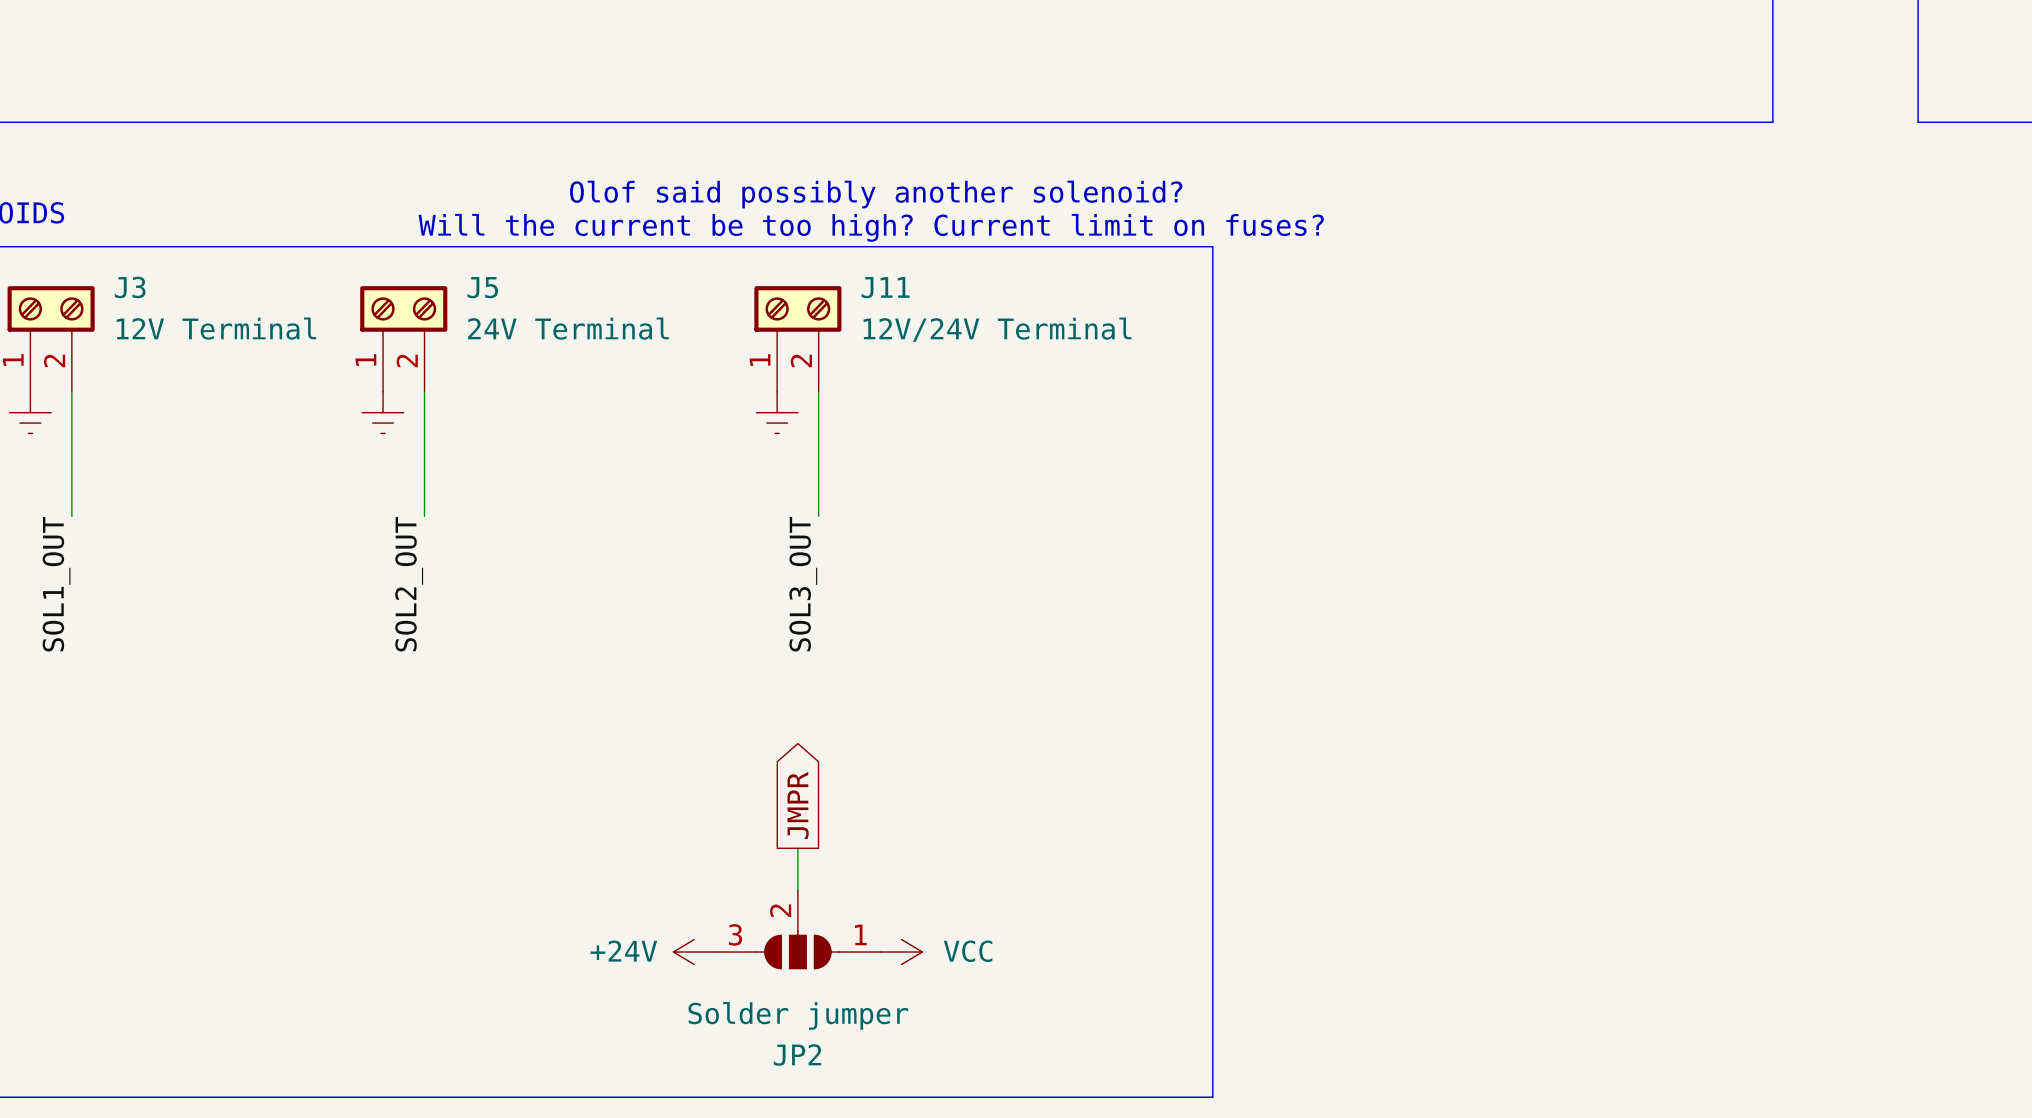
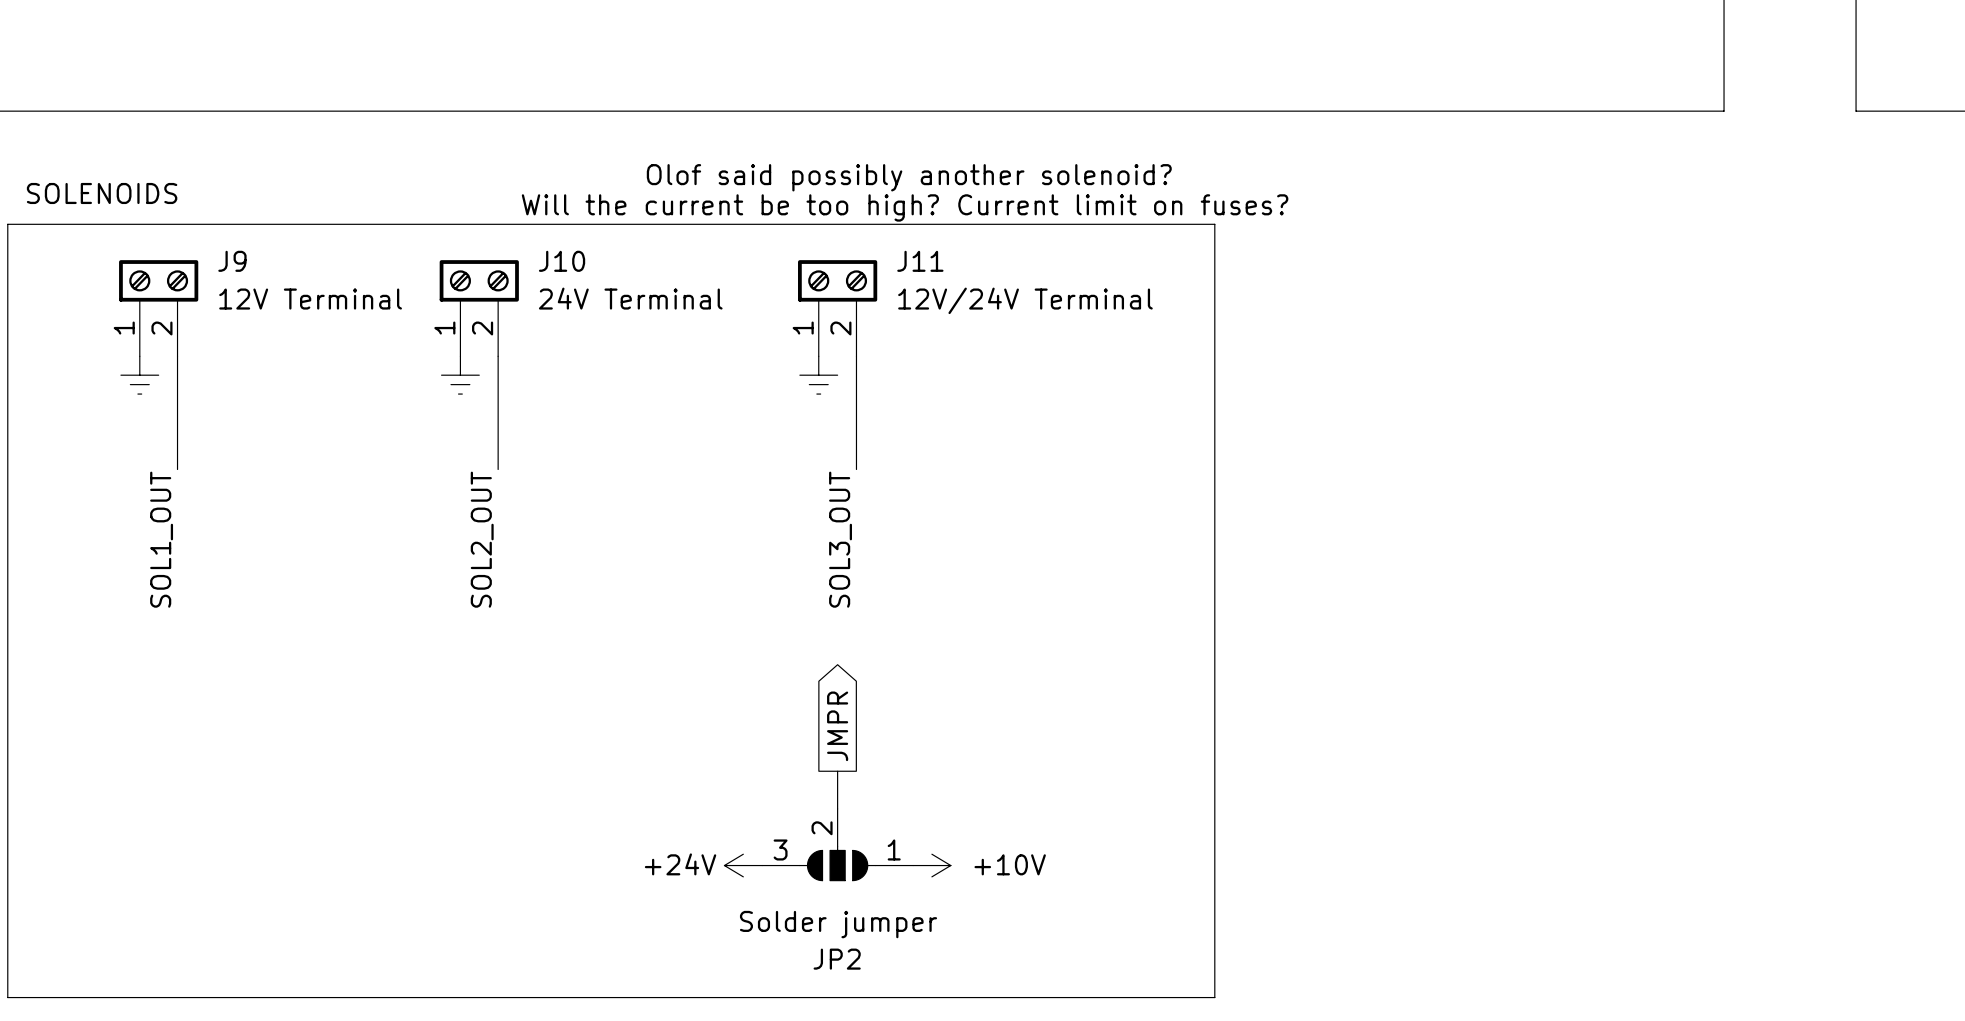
J3 name: J3 (130, 287) -> J9 (232, 261)
J5 name: J5 (482, 287) -> J10 (562, 261)
power symbol: VCC (901, 952) -> +10V (931, 865)

